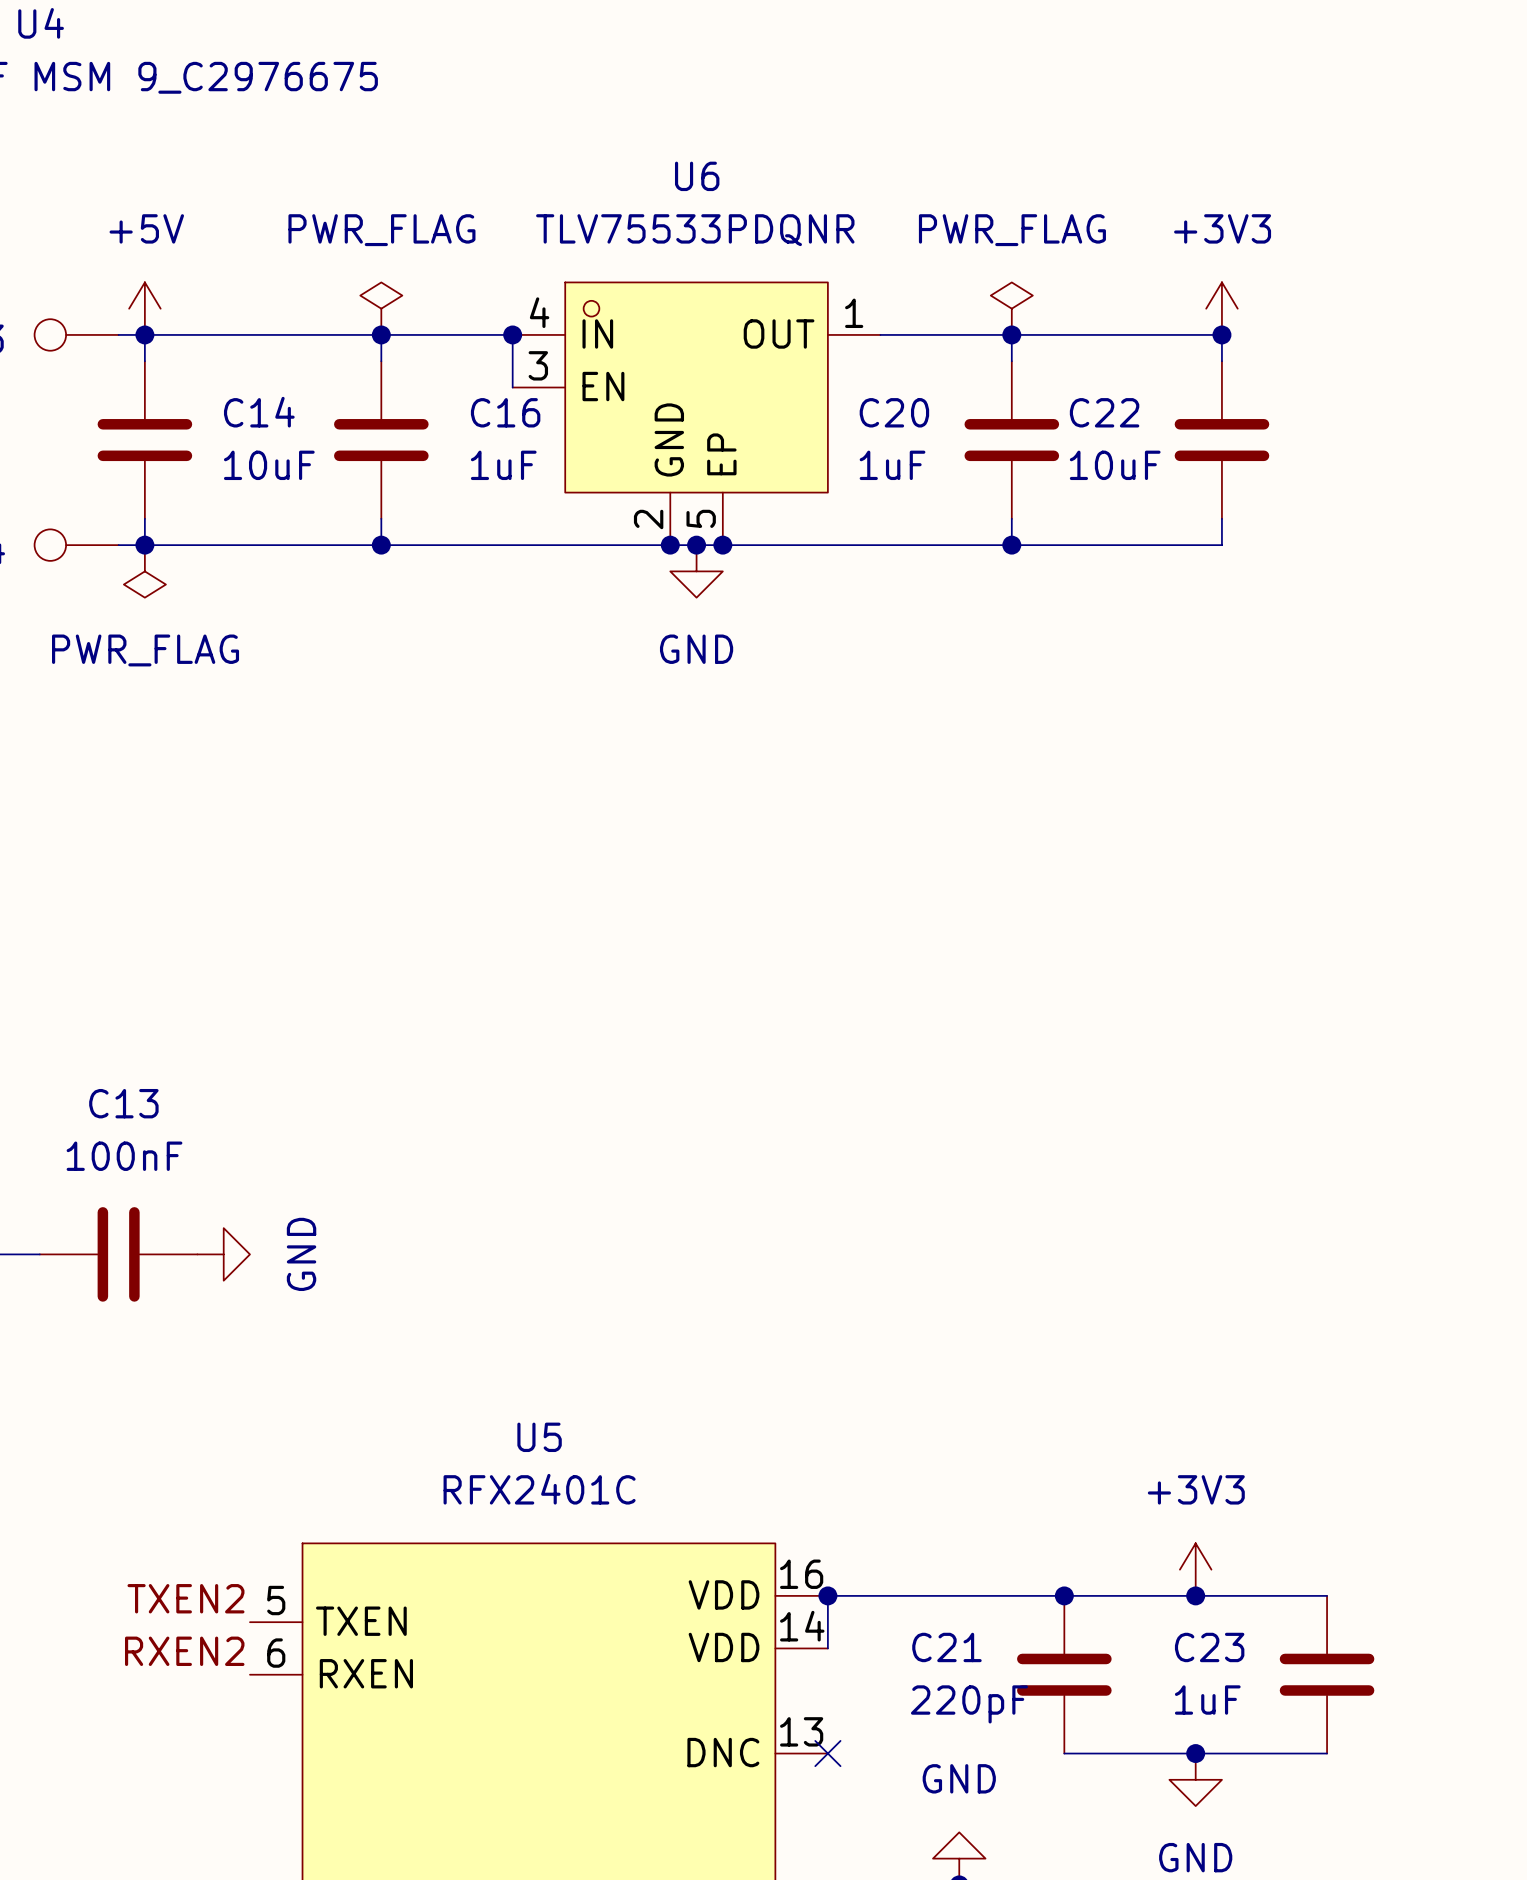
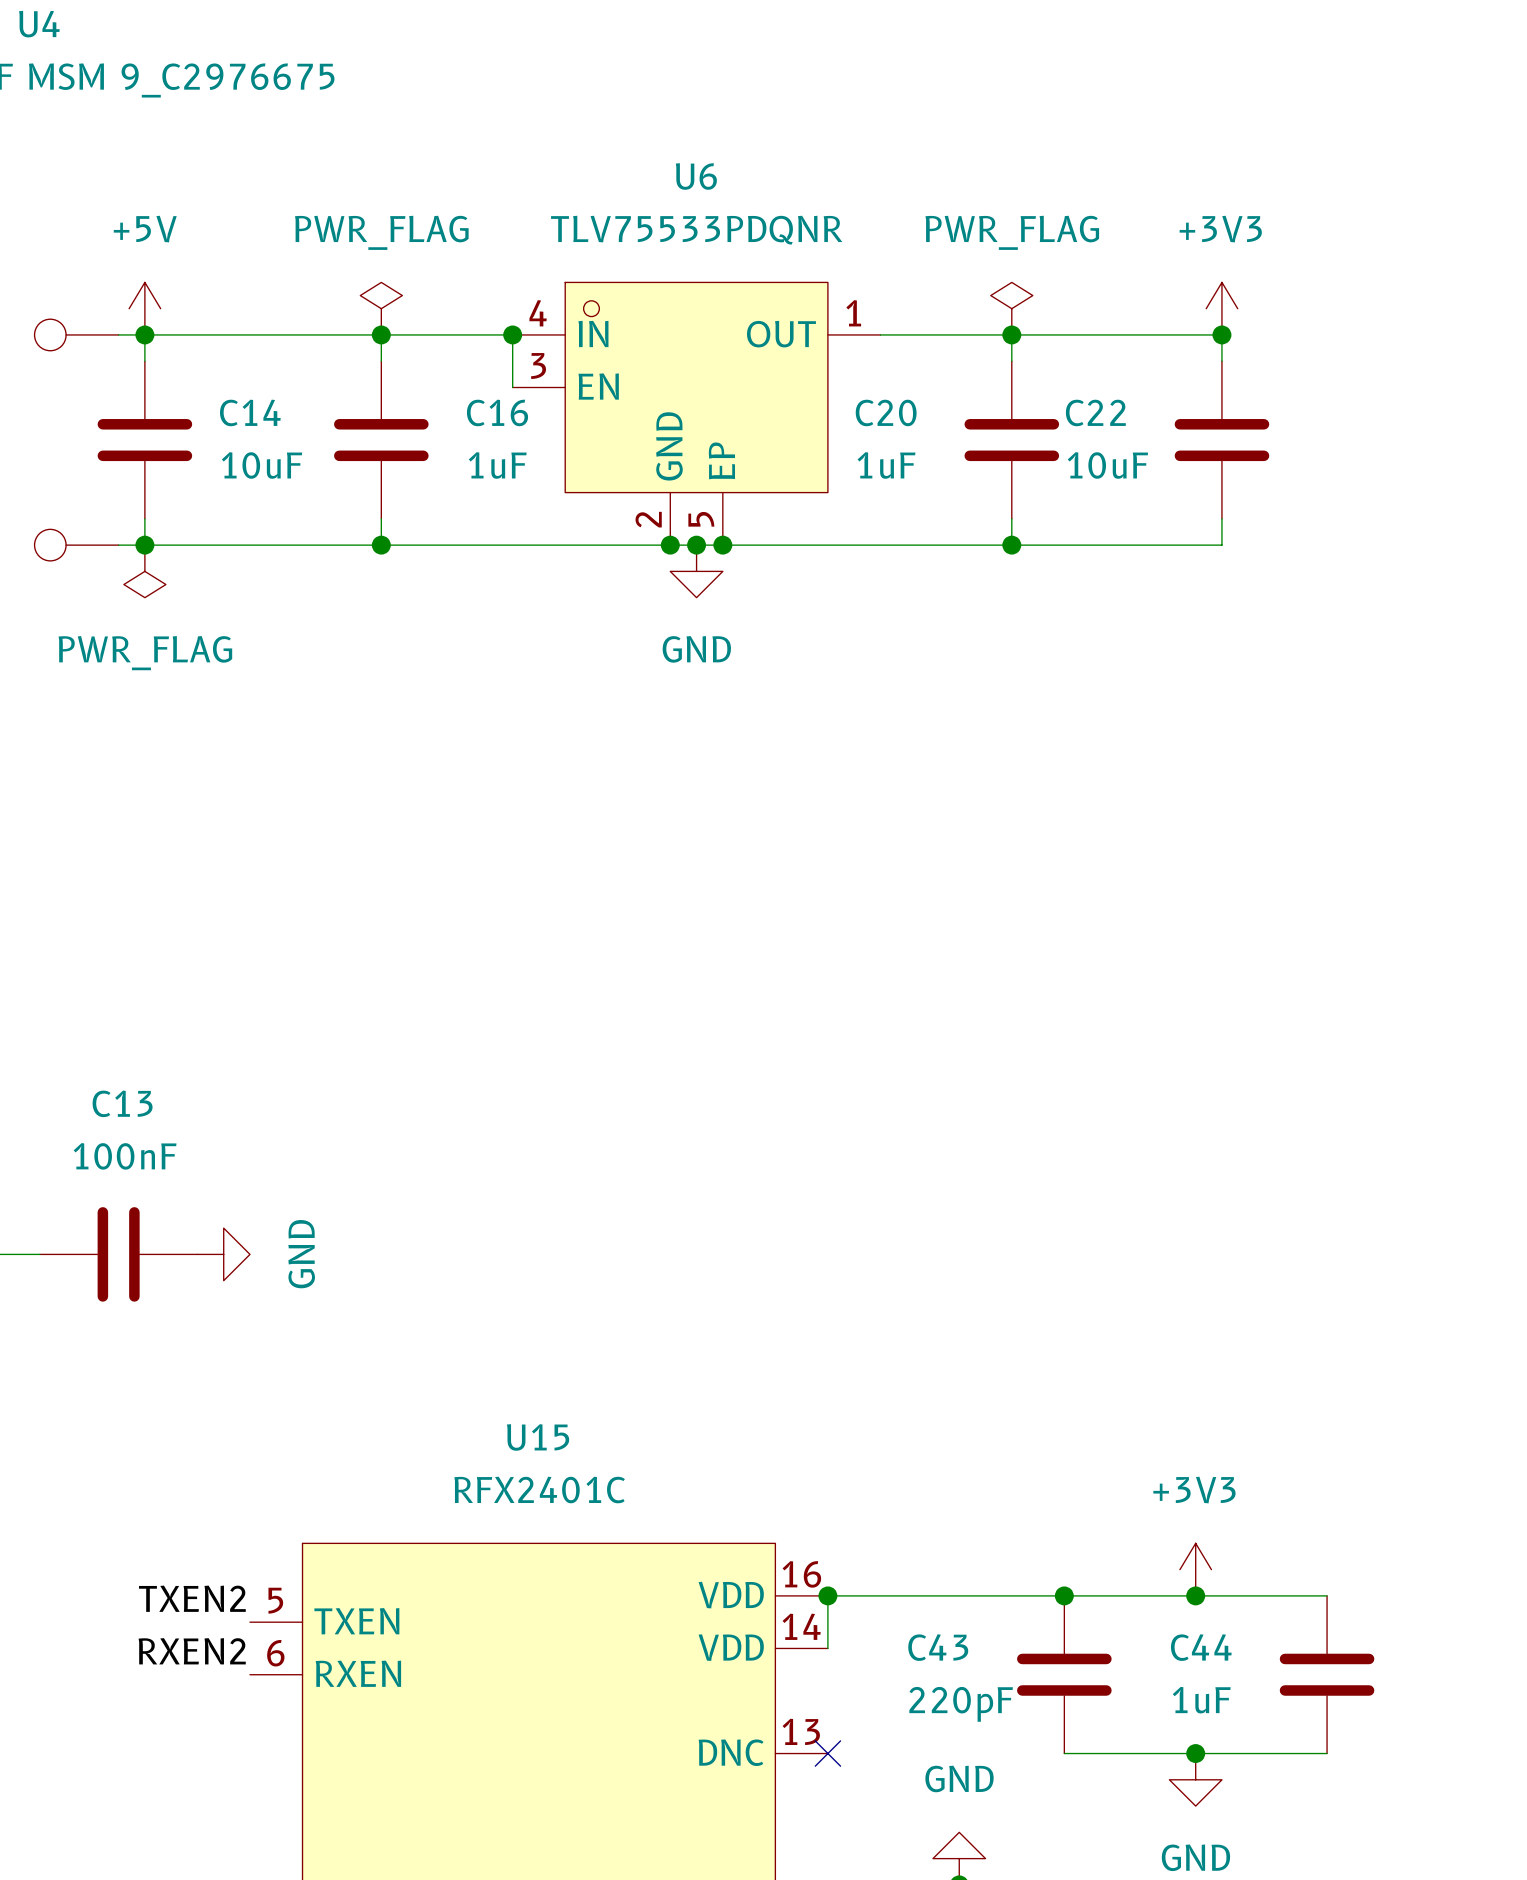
U5 name: U5 (539, 1437) -> U15 (538, 1437)
C21 name: C21 (946, 1647) -> C43 (938, 1647)
C23 name: C23 (1209, 1647) -> C44 (1201, 1647)

